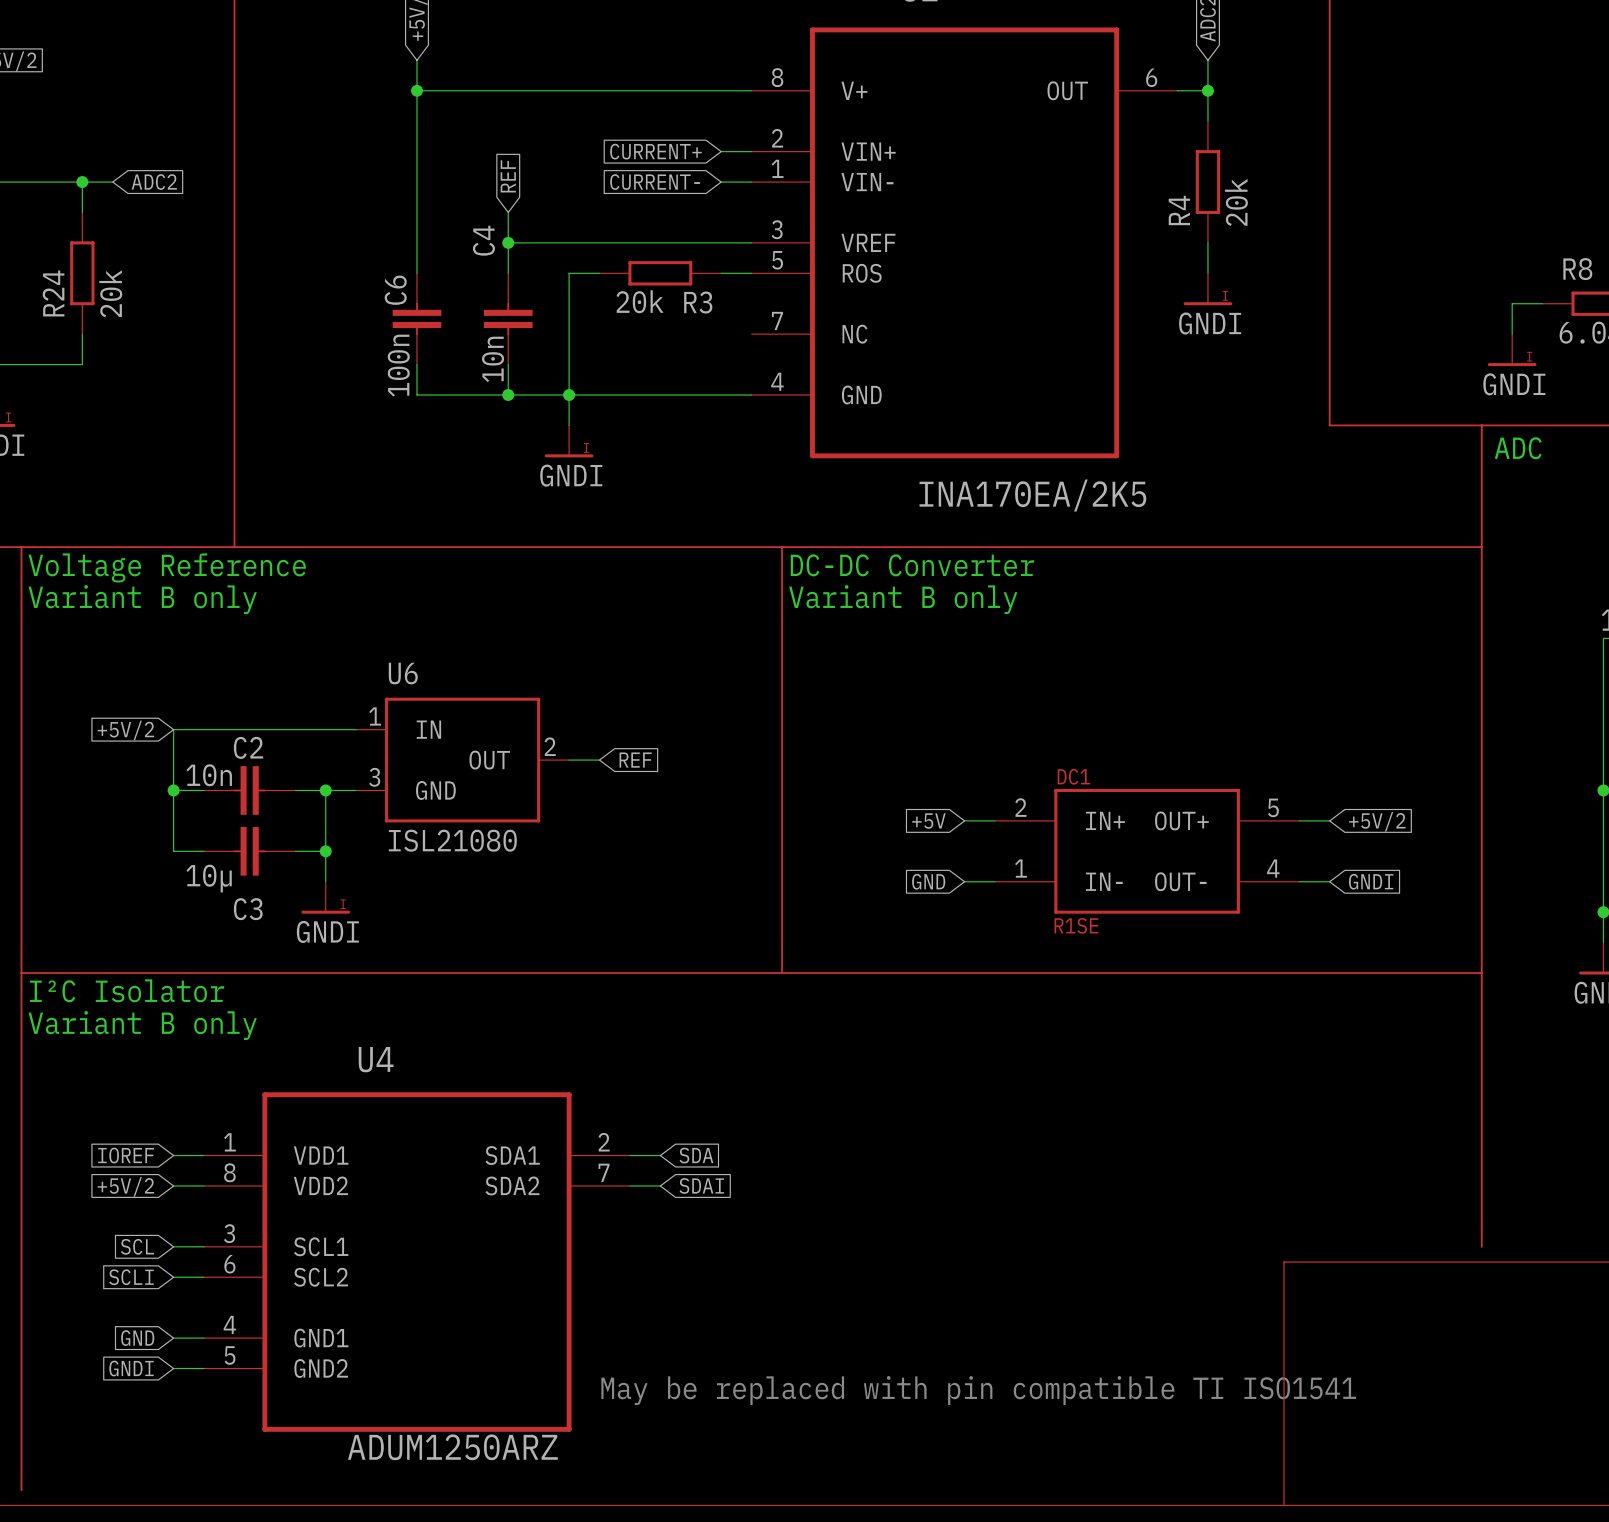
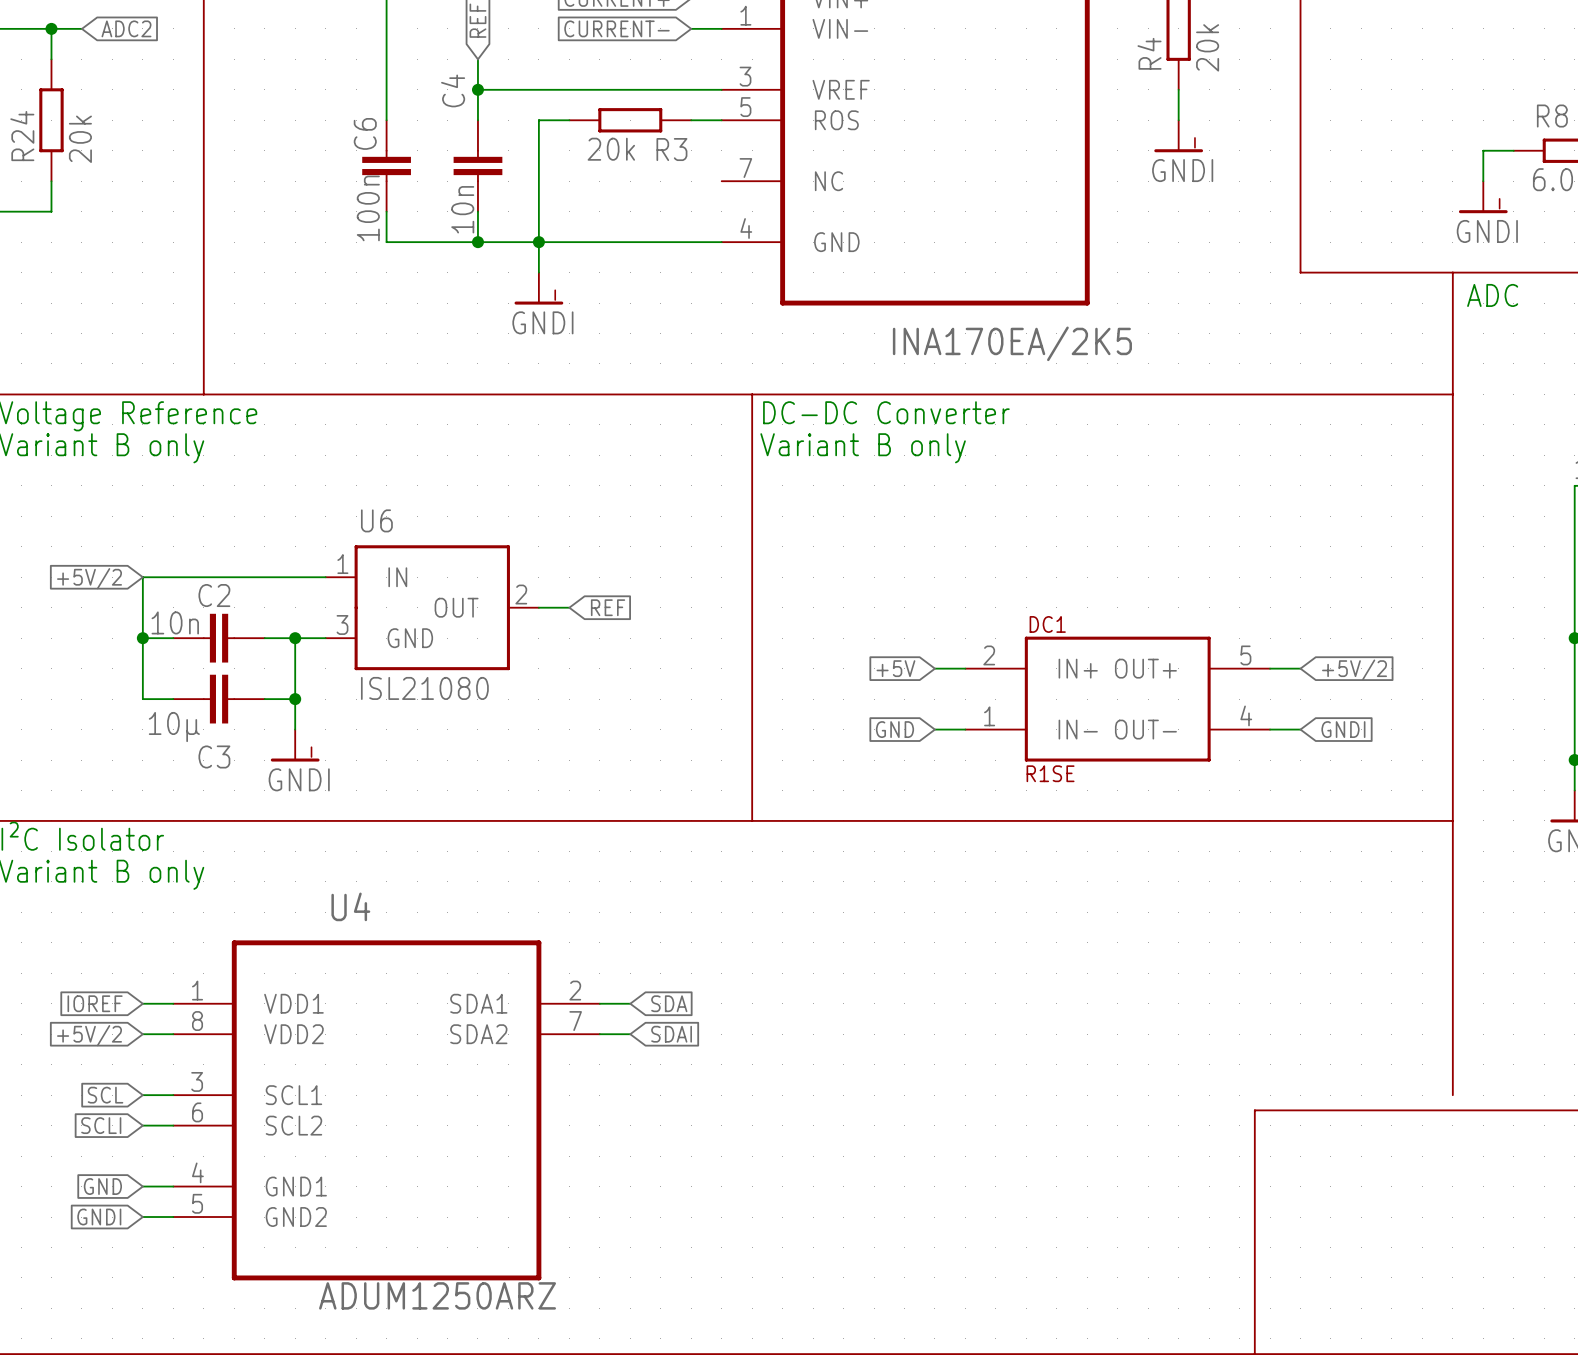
text: May be replaced with pin compatible TI ISO1541 (978, 1390) -> none

